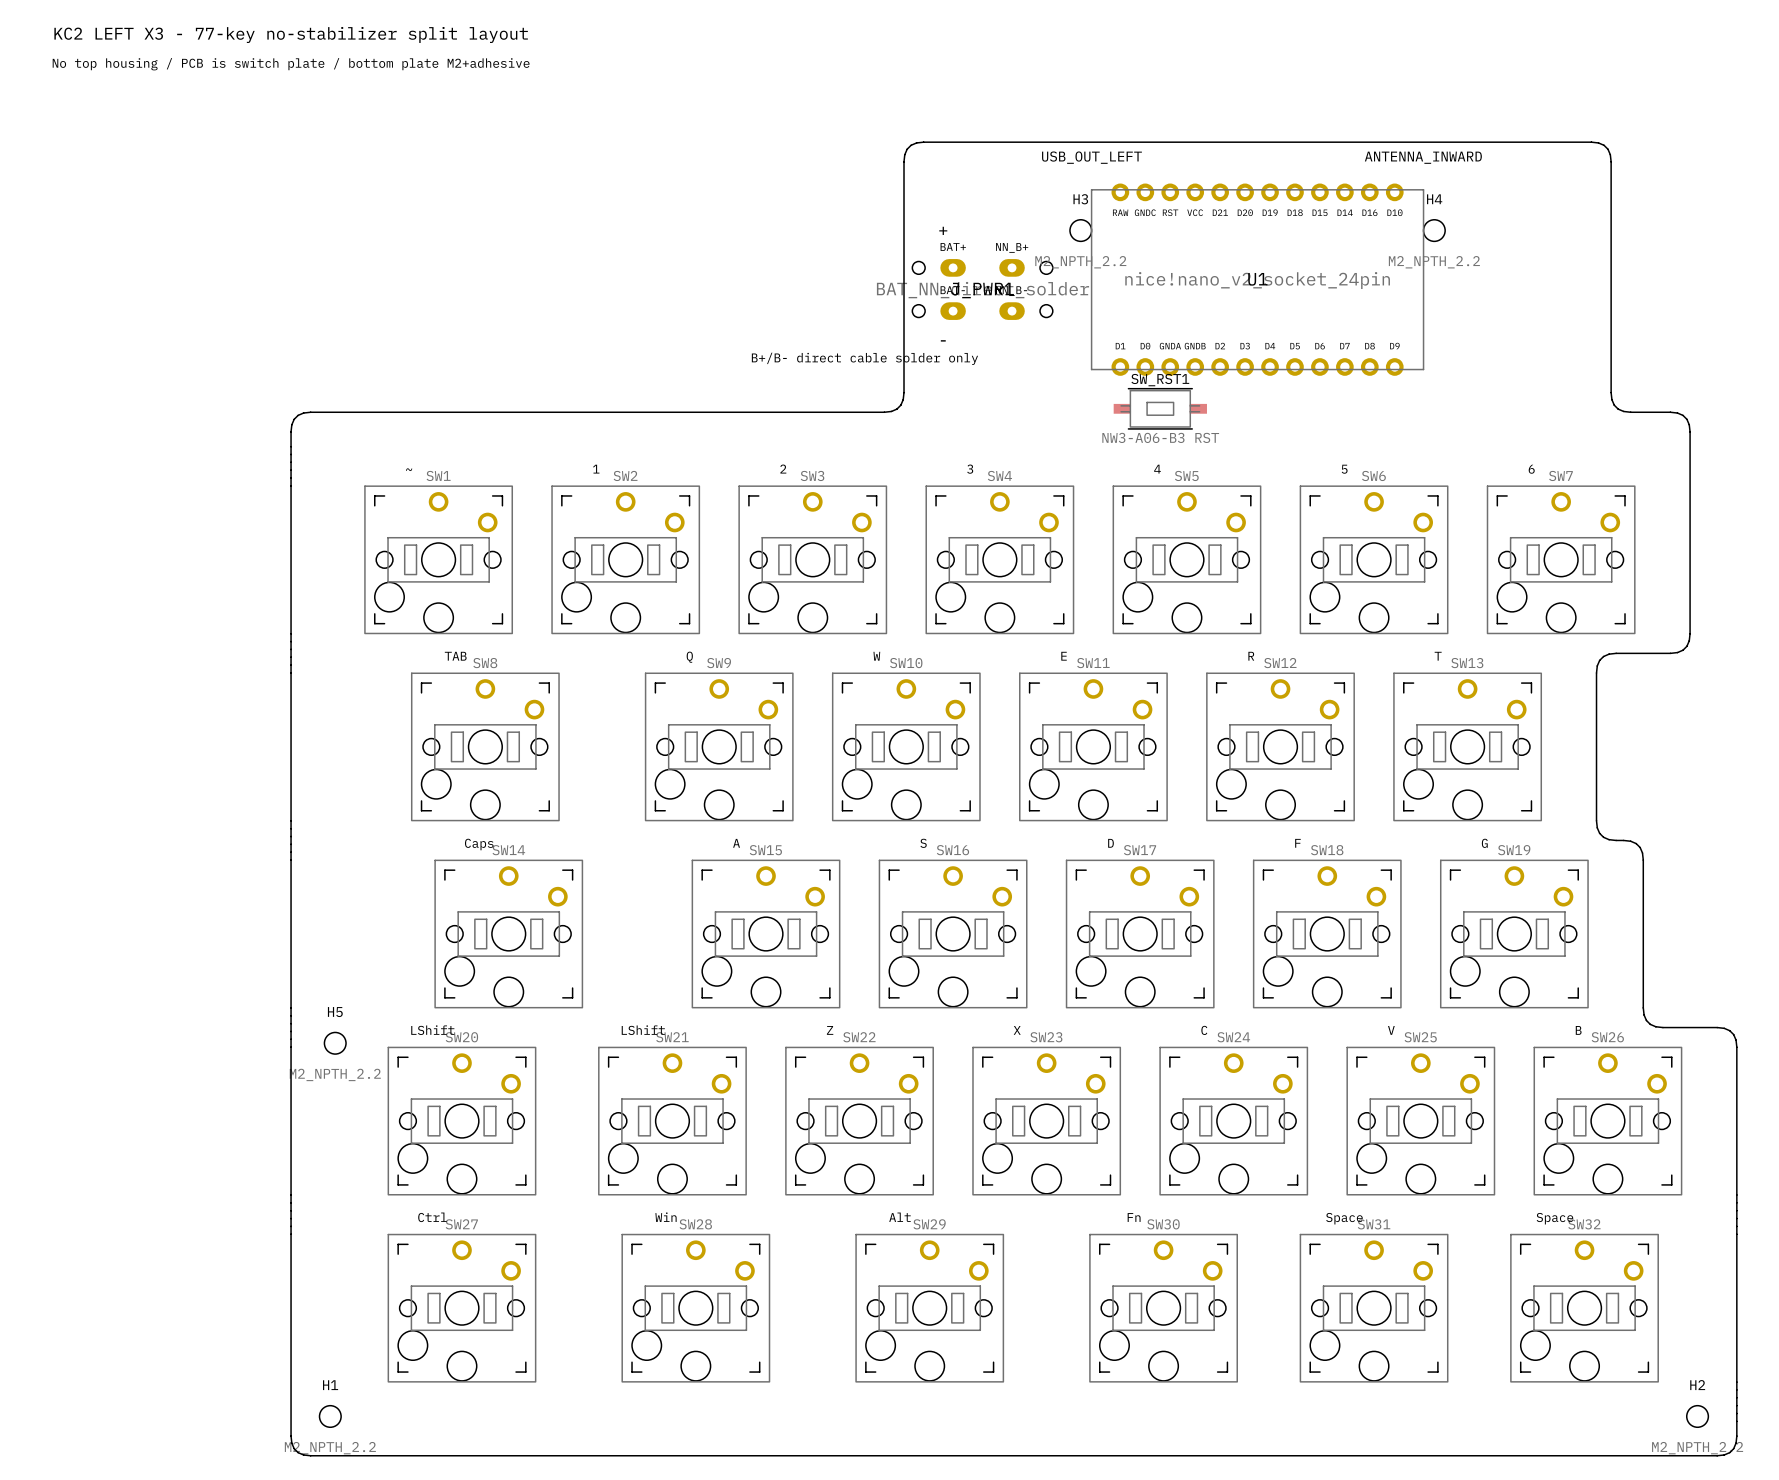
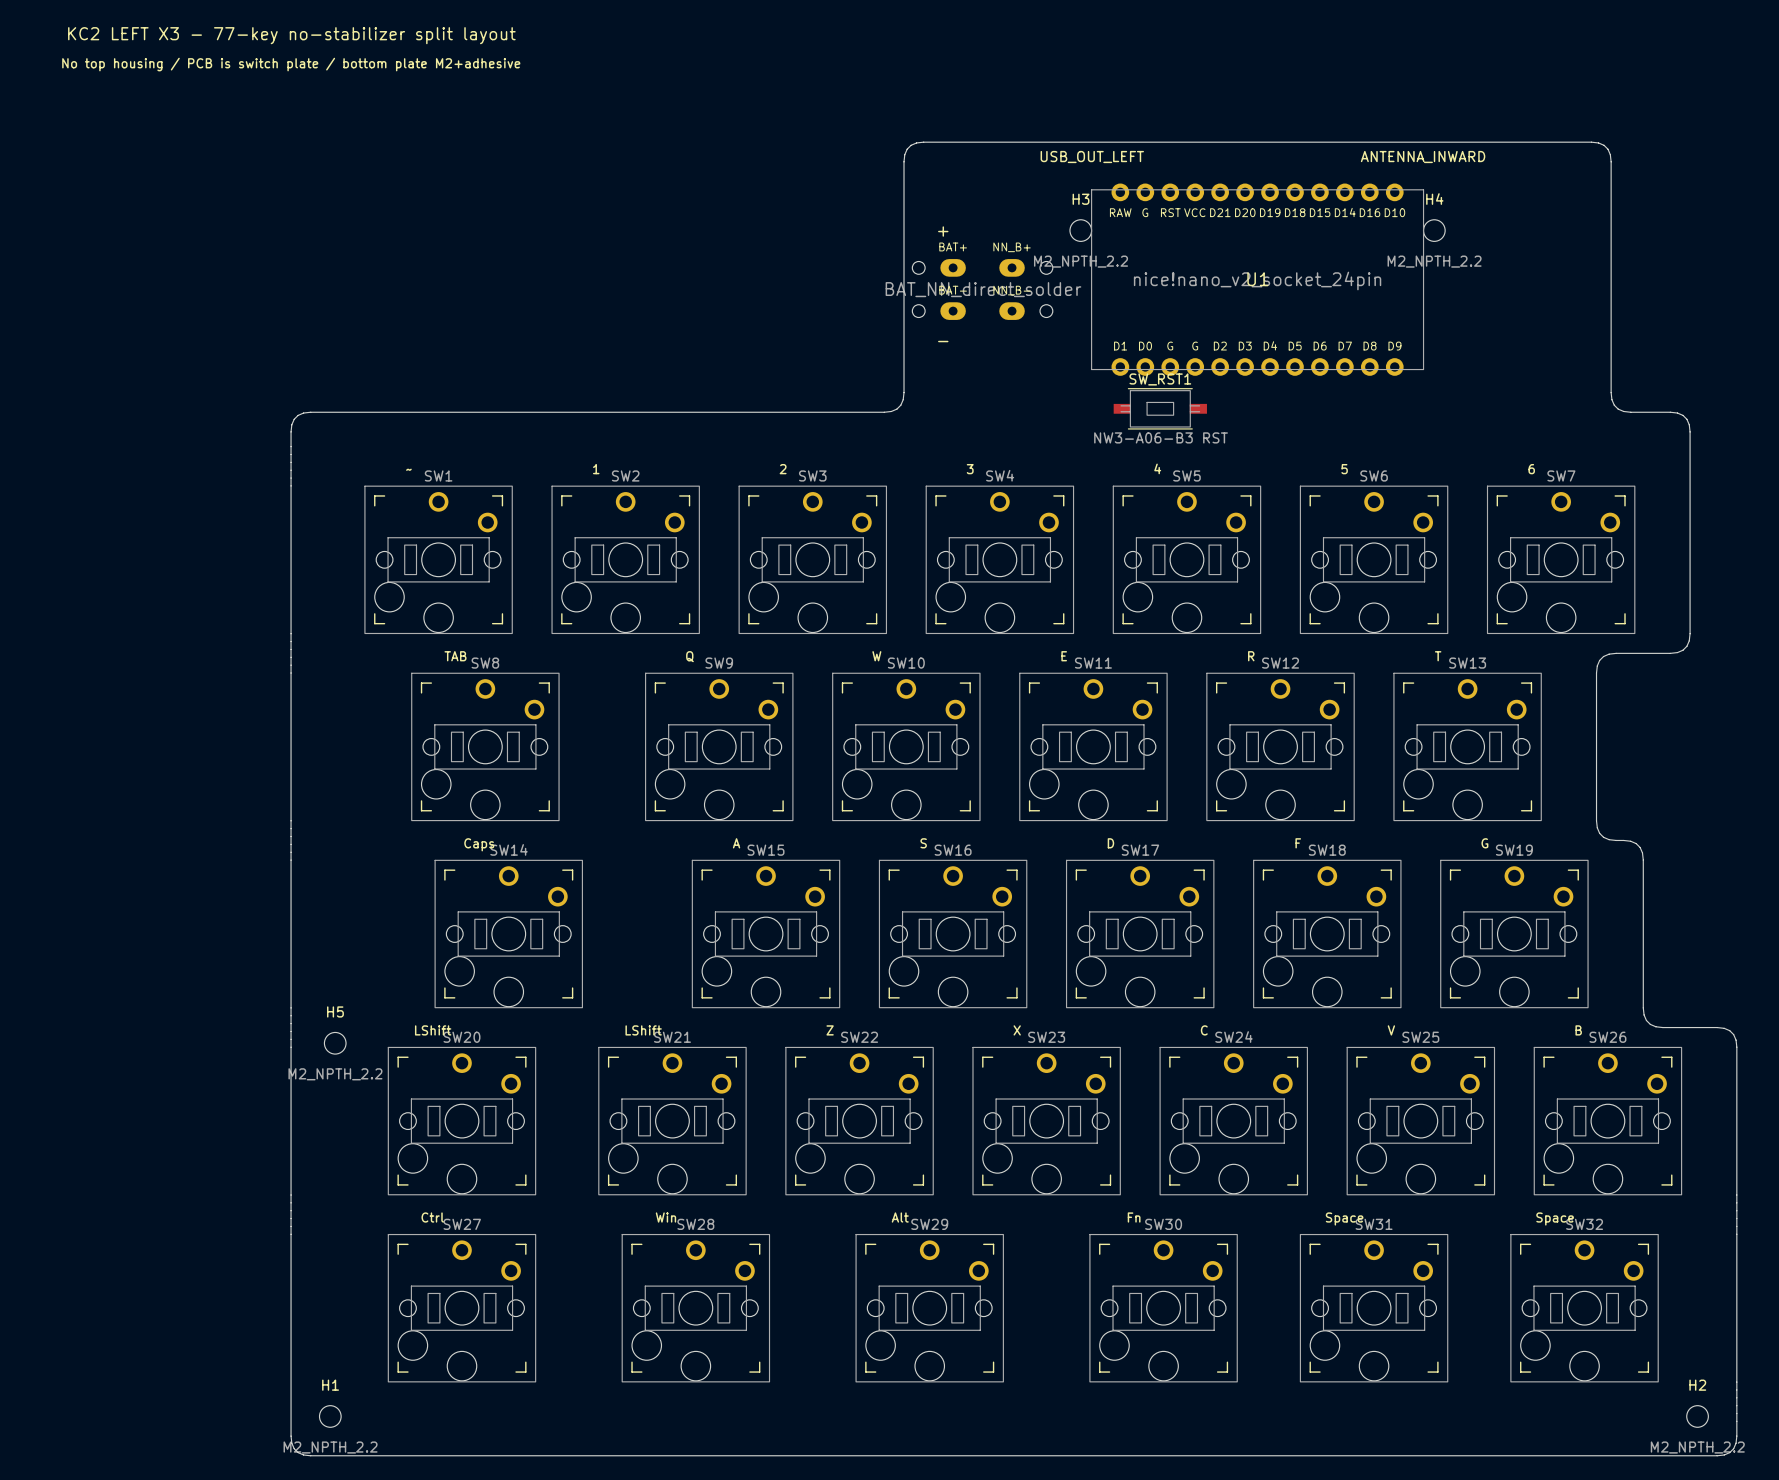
U1 footprint: [1111, 183, 1404, 376] -> [1111, 183, 1404, 376]
J_PWR1 name: J_PWR1 (982, 290) -> none
text: B+/B- direct cable solder only (864, 358) -> none

